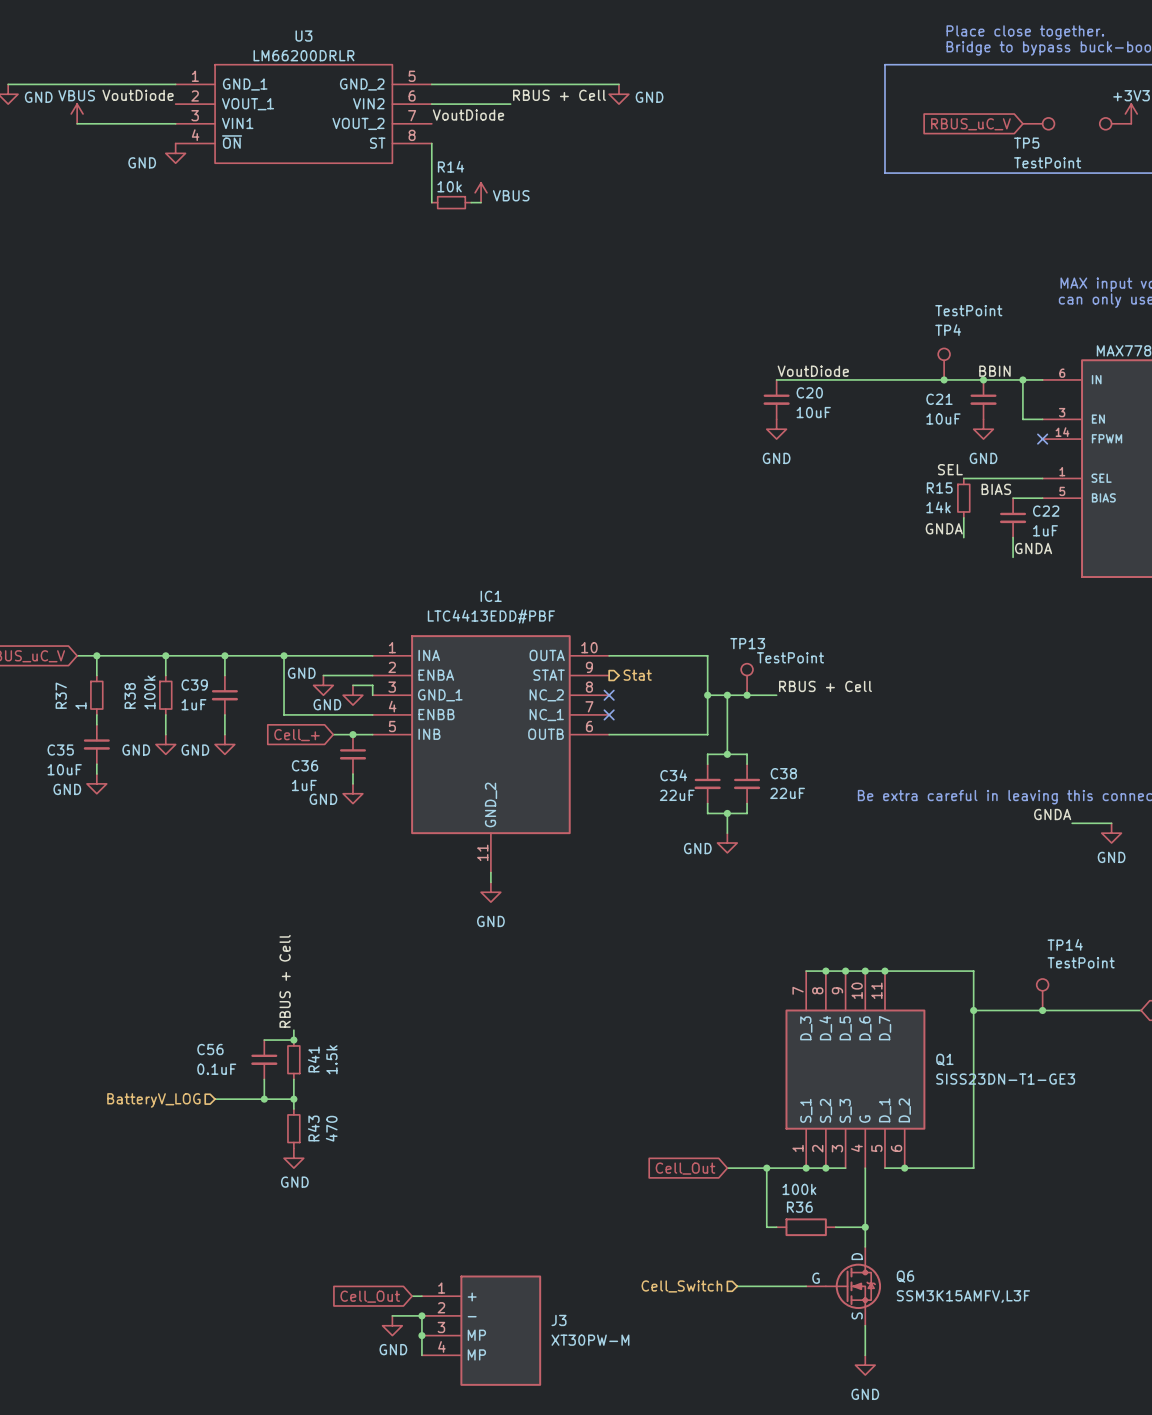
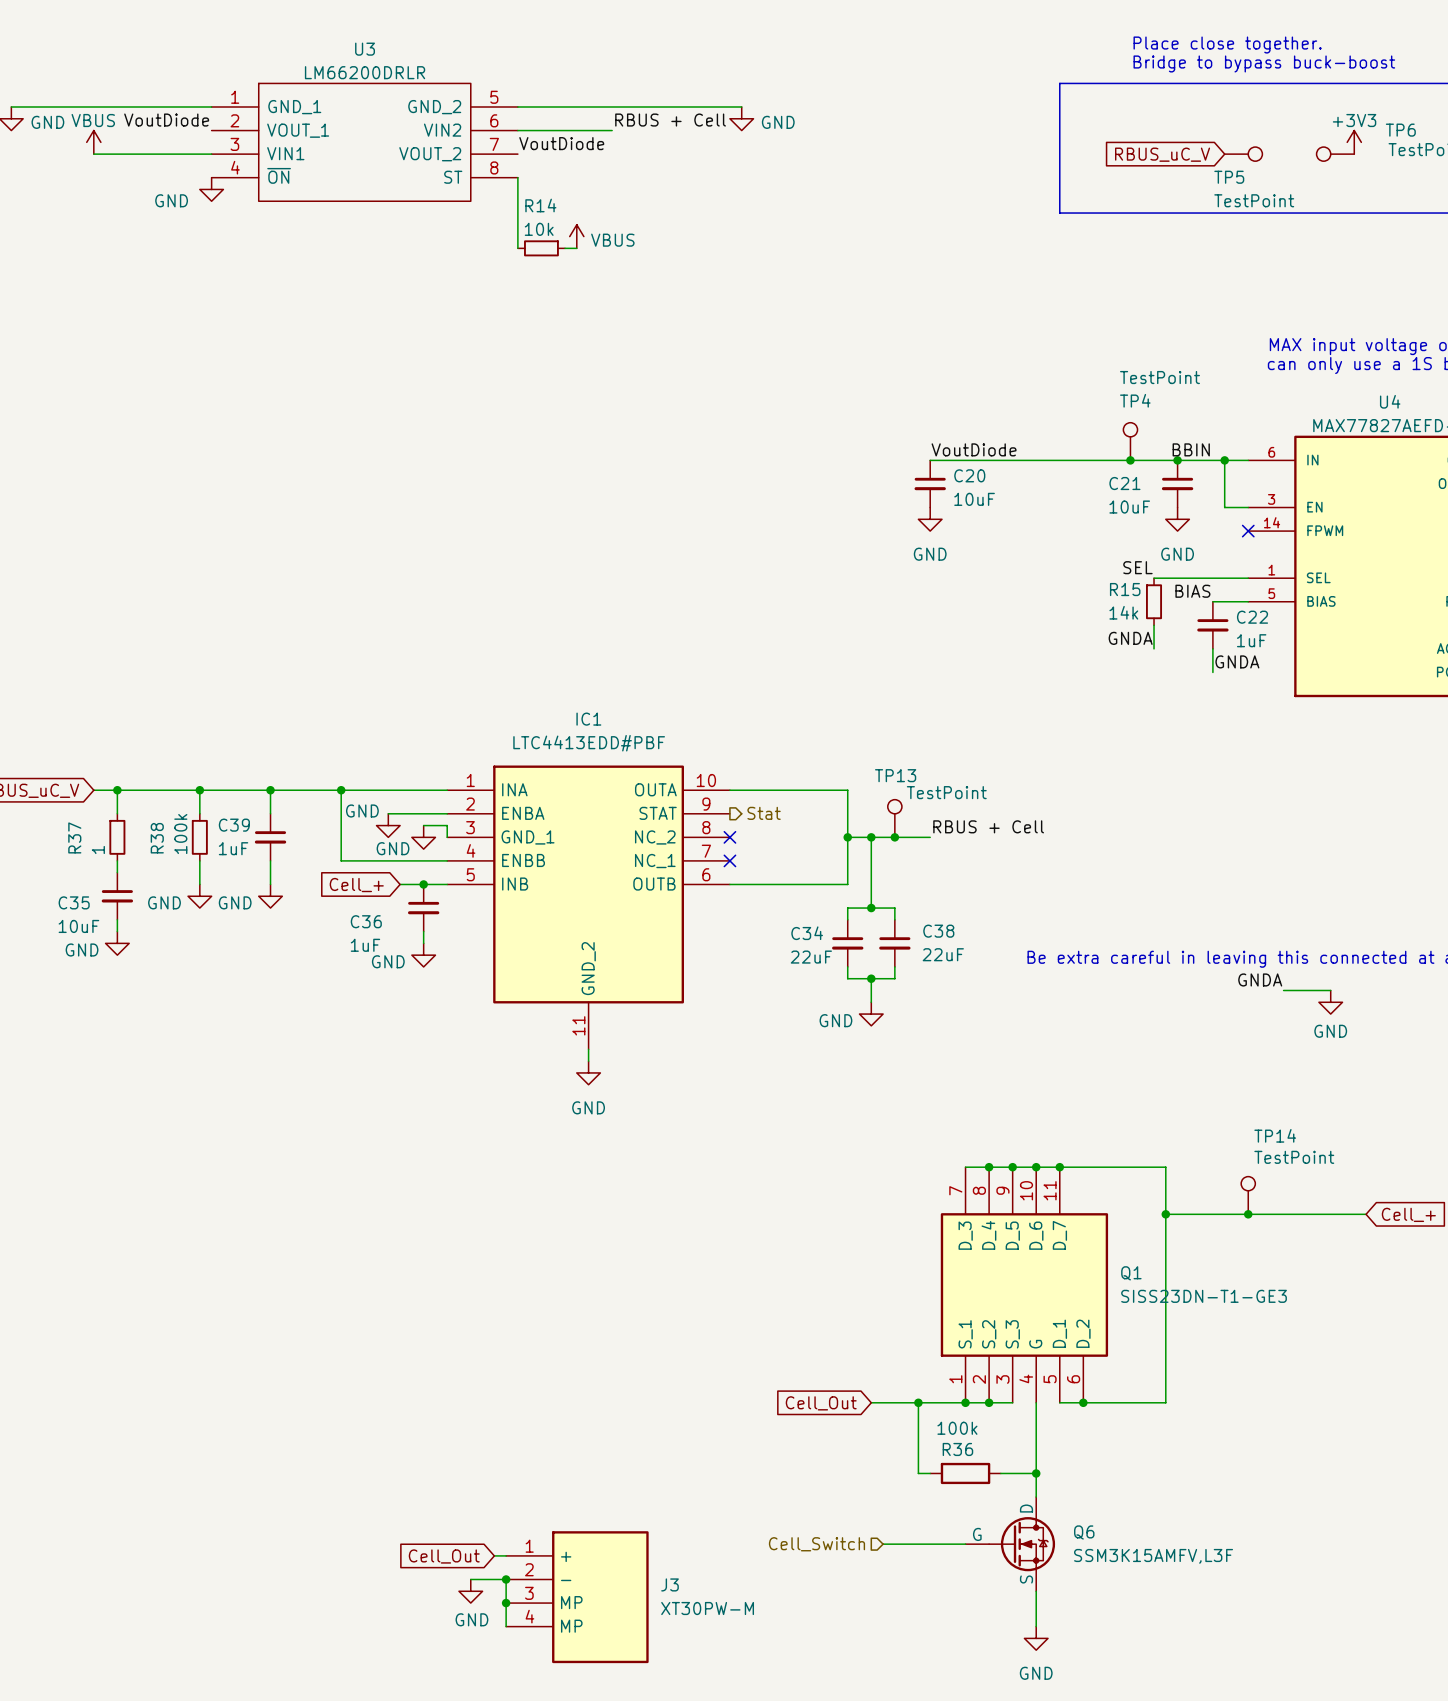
label: RBUS + Cell (285, 981) -> none
wire: (293, 1030) (293, 1040) (264, 1040) -> none
junction: (293, 1040) -> none
C56: 0.1uF (264, 1059) -> none
R41: 1.5k (293, 1059) -> none
wire: (264, 1079) (264, 1099) -> none
wire: (293, 1079) (293, 1109) -> none
wire: (215, 1099) (293, 1099) -> none
junction: (264, 1099) -> none
junction: (293, 1099) -> none
hierarchical label: BatteryV_LOG (153, 1100) -> none
R43: 470 (293, 1128) -> none
power symbol: GND (293, 1158) -> none

